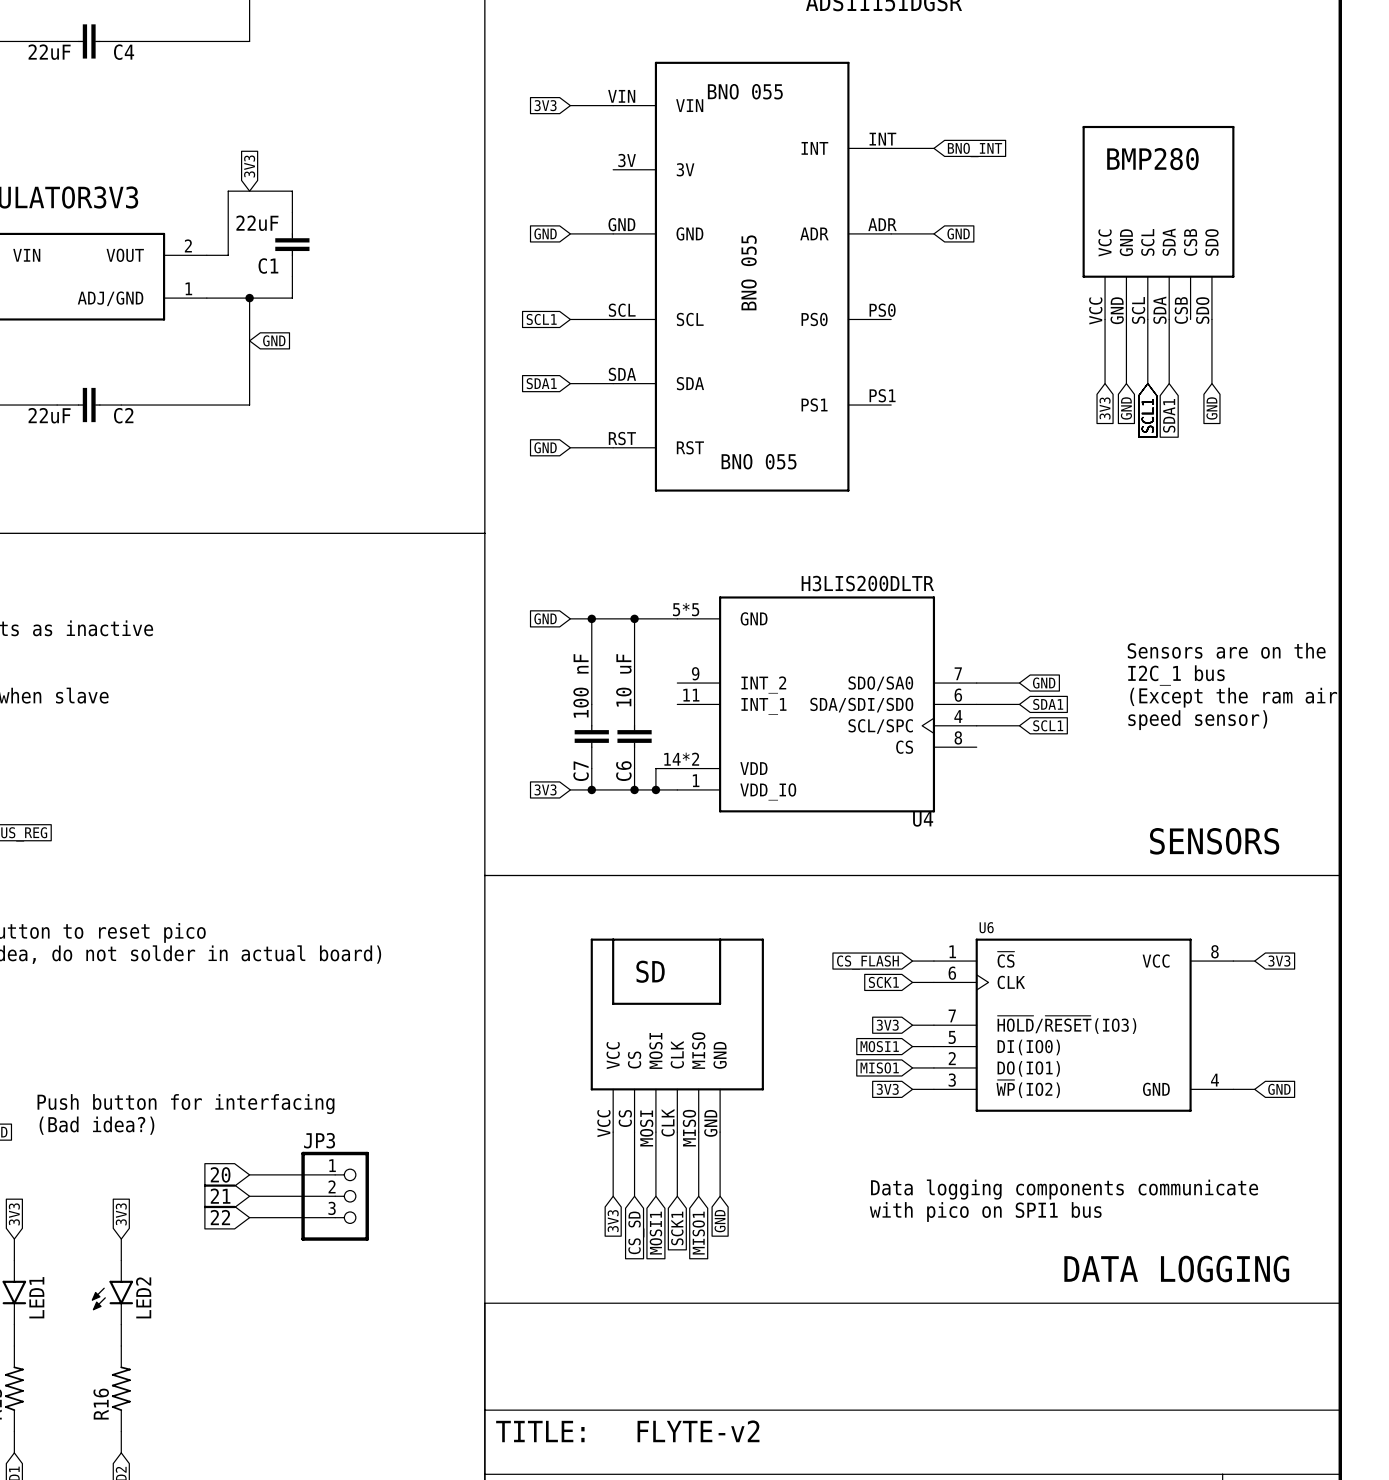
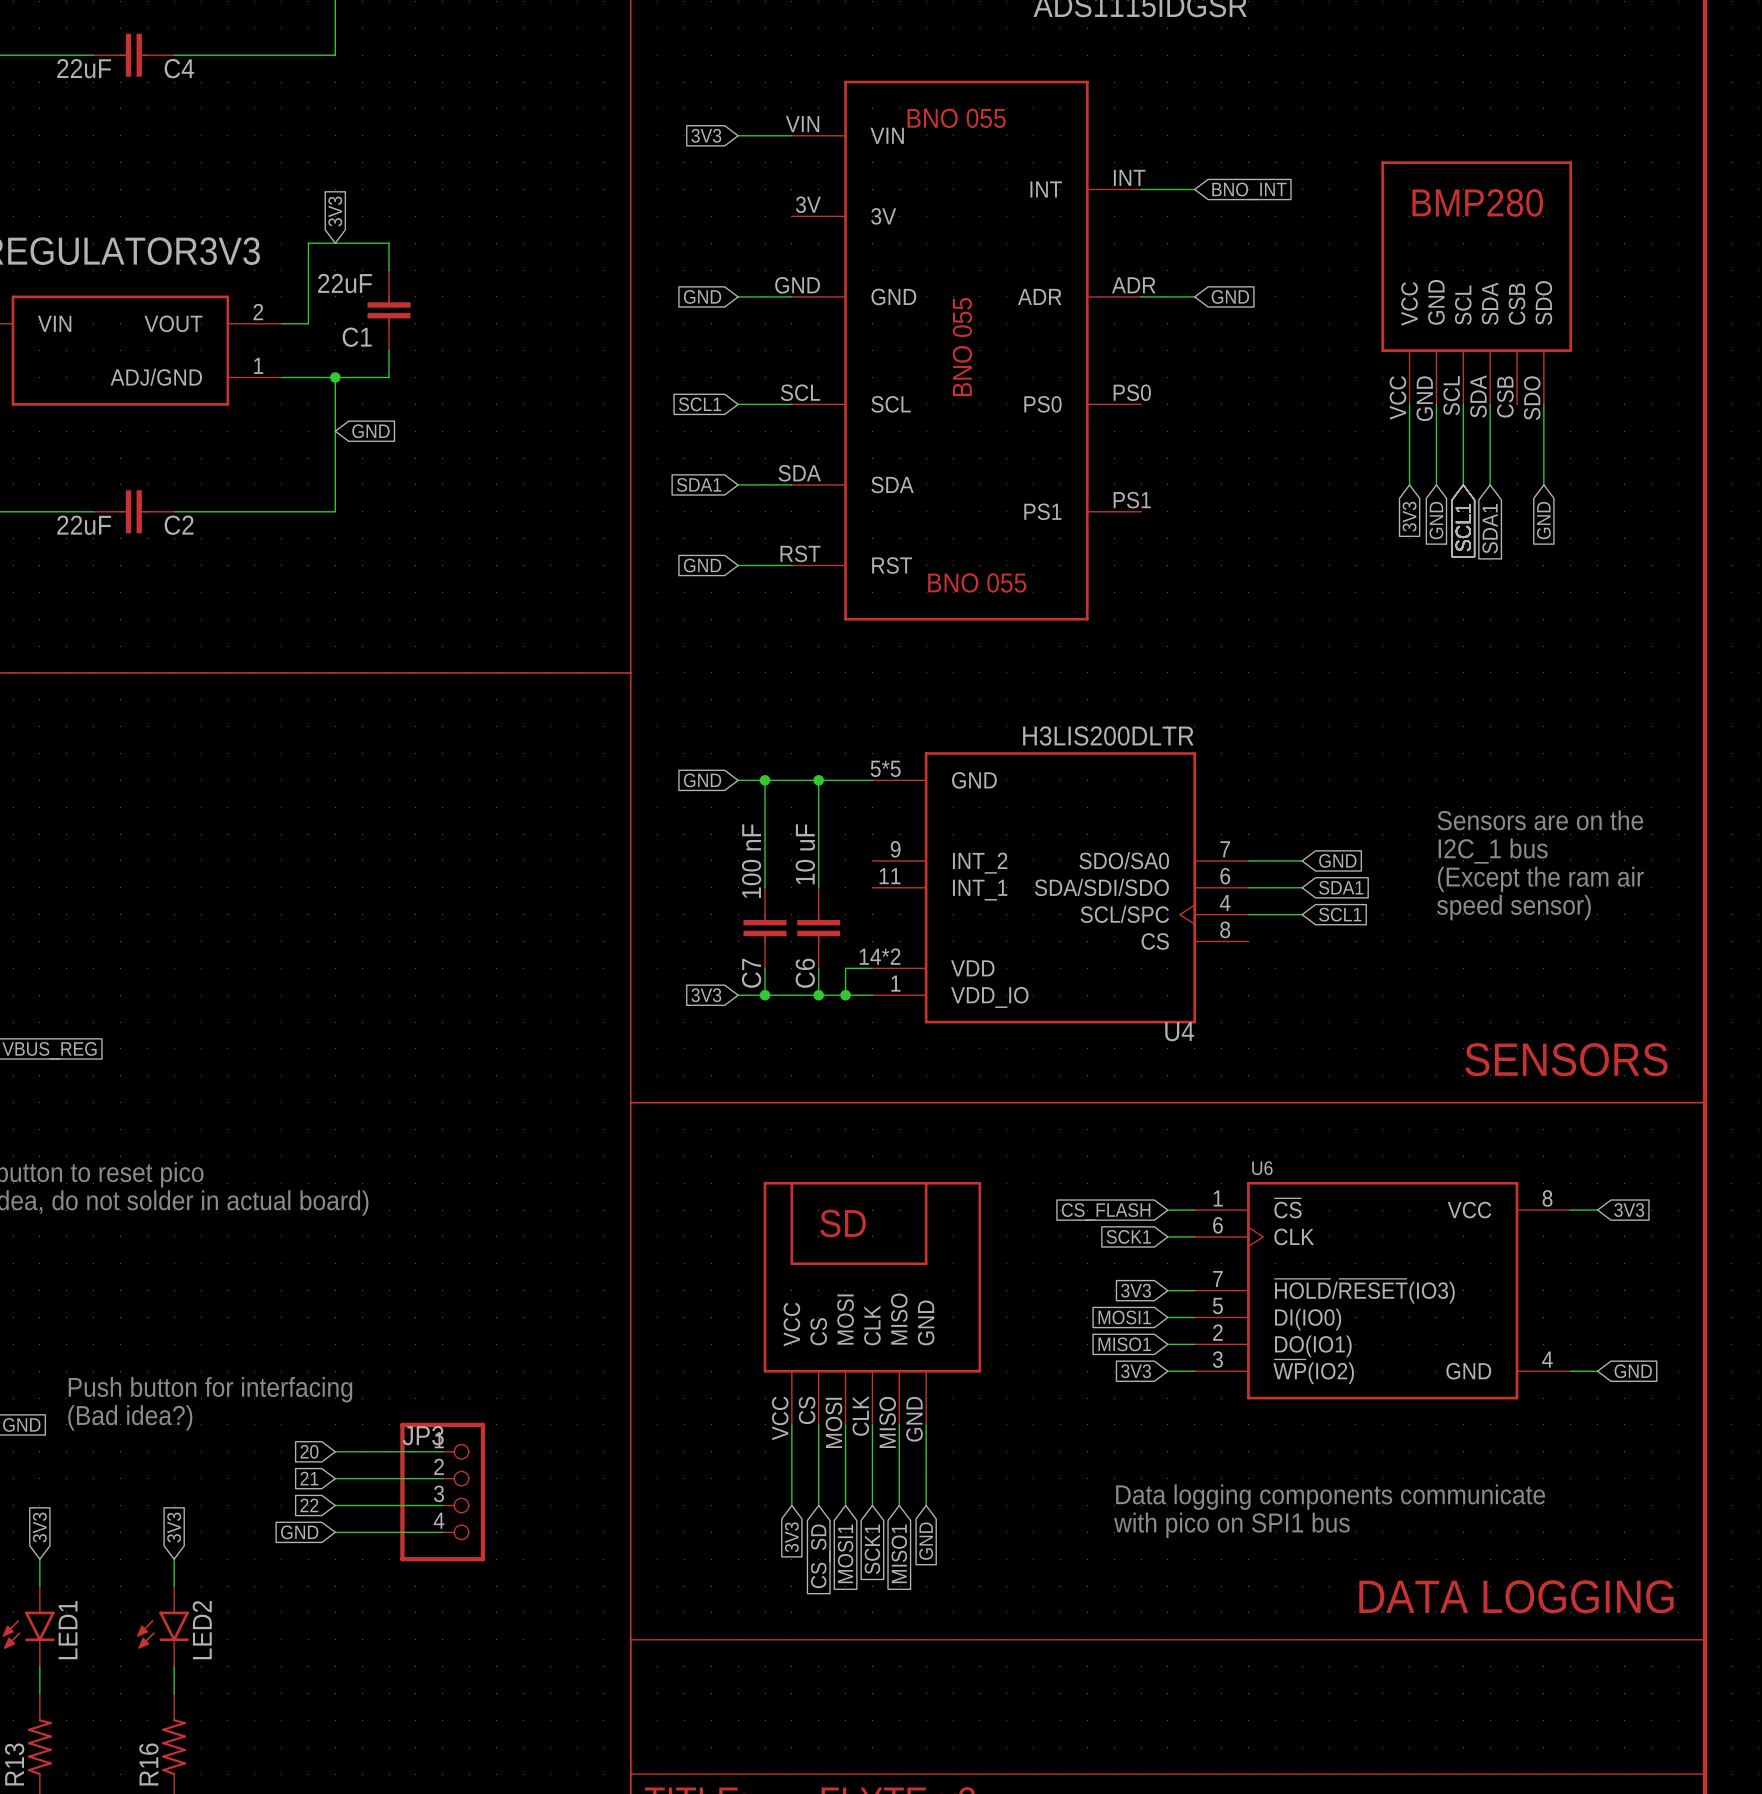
JP3 symbol: [301, 1151, 369, 1241] -> [400, 1422, 486, 1562]
global label: none -> 20 (309, 1451)
wire: none -> (335, 1451) (442, 1451)
global label: 20 (220, 1174) -> 21 (309, 1478)
global label: 21 (220, 1196) -> 22 (309, 1505)
global label: 22 (220, 1217) -> GND (299, 1532)

